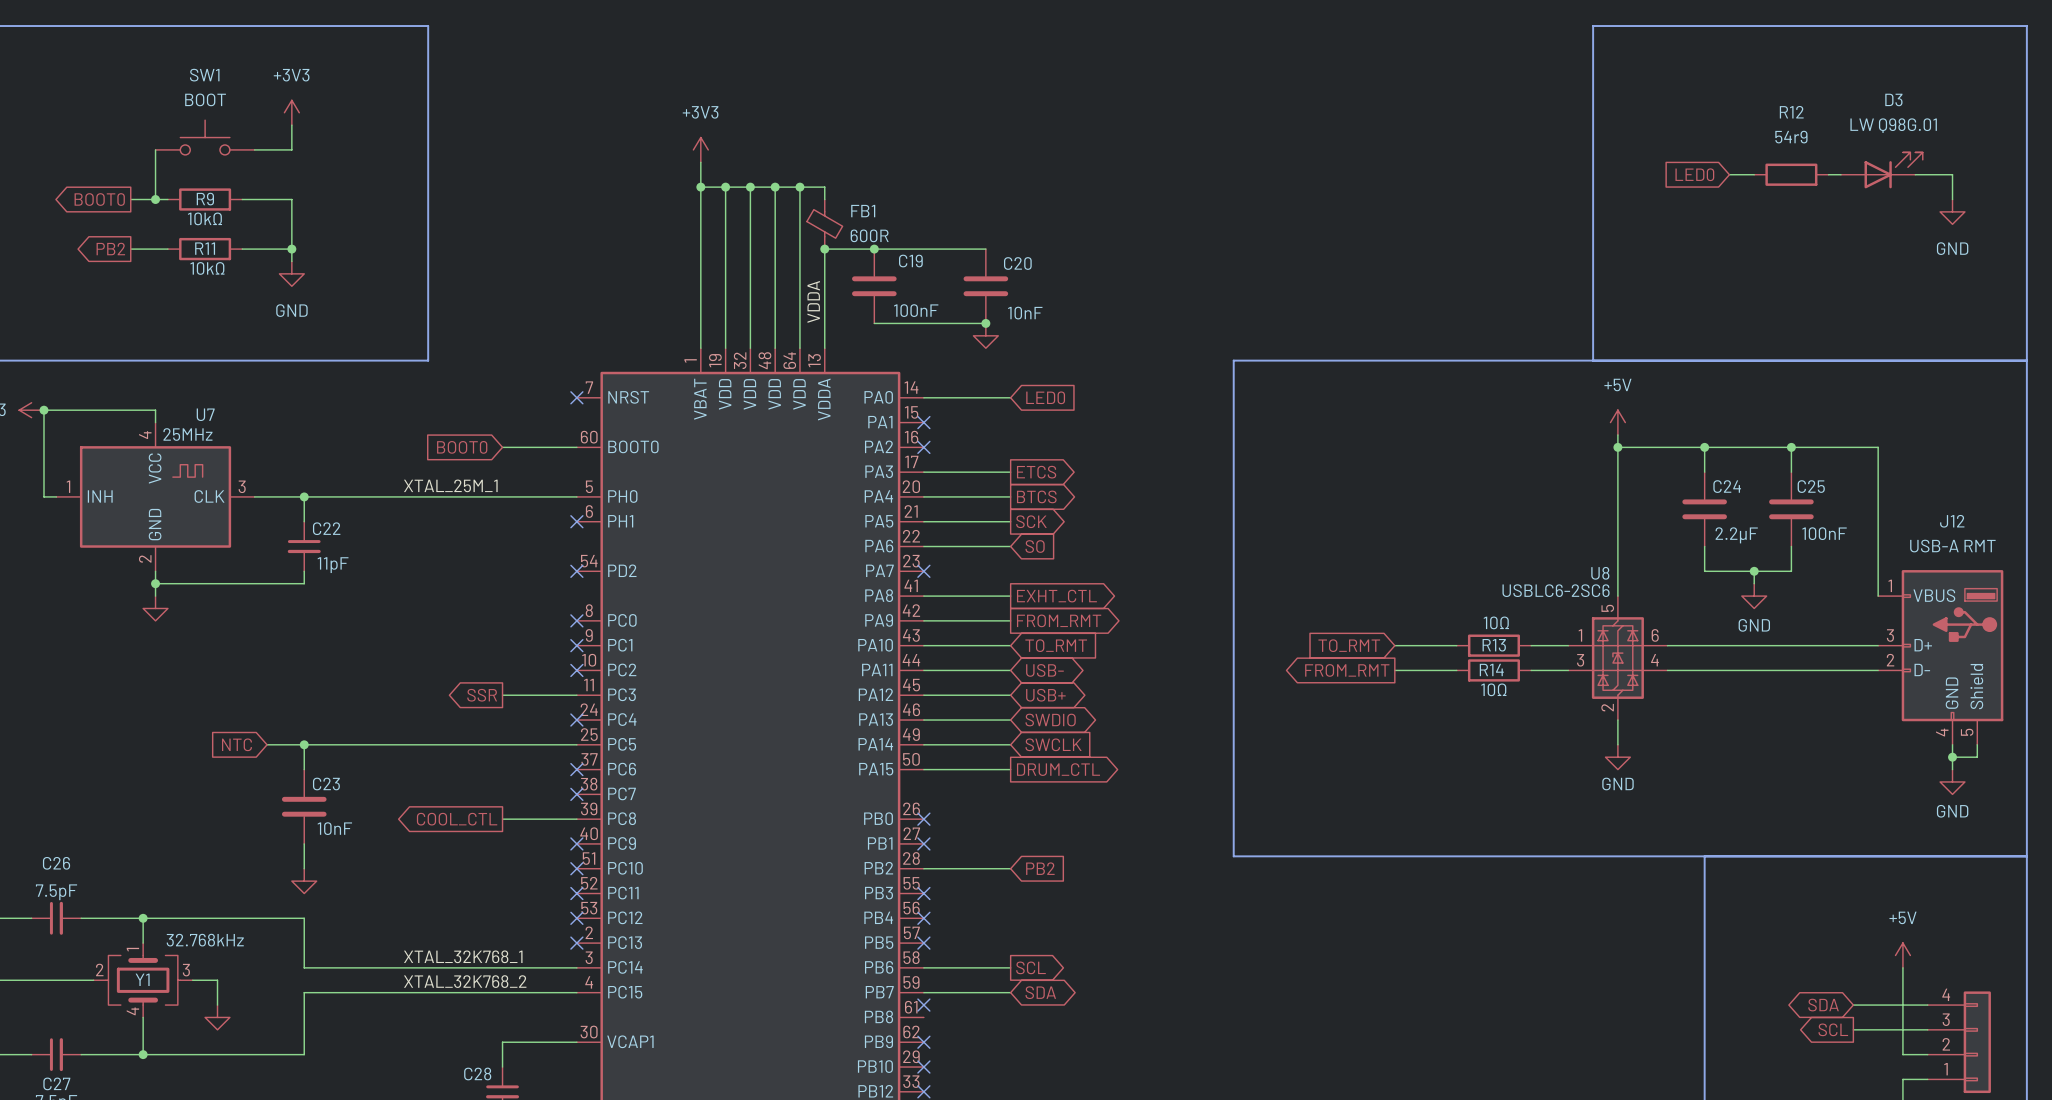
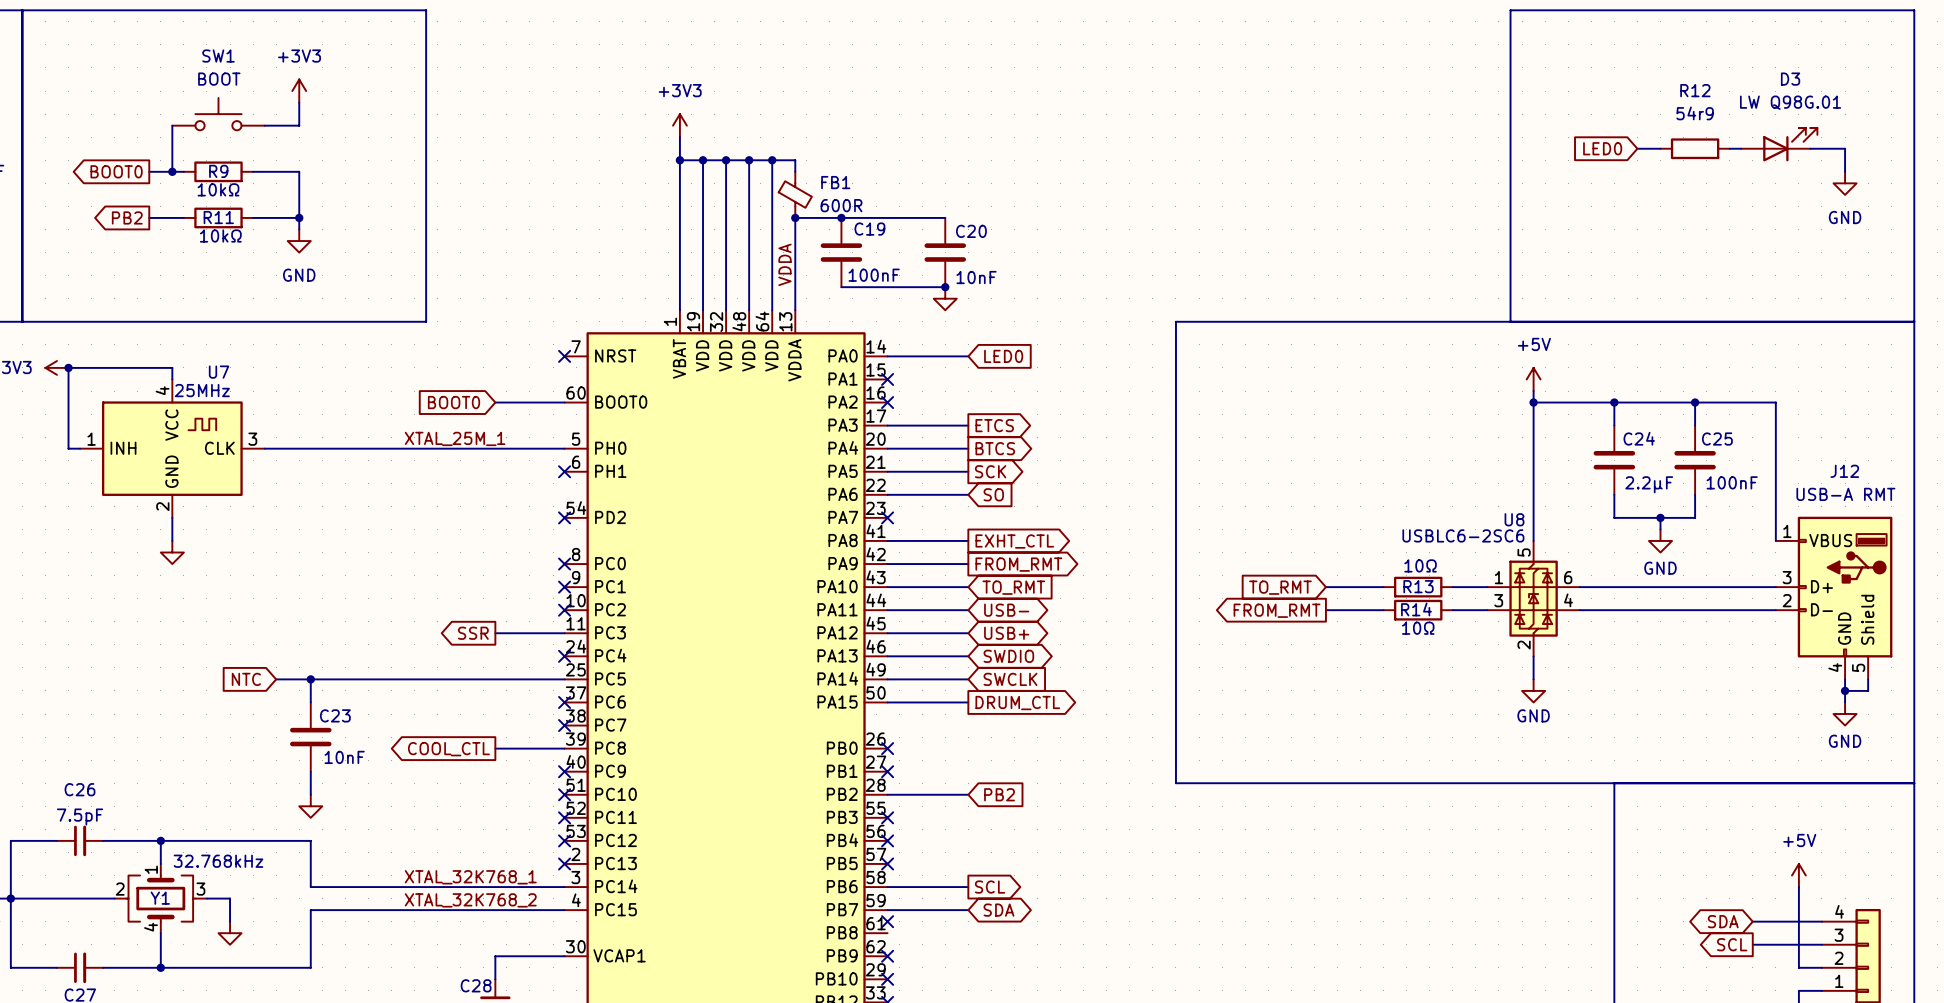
wire: (304, 496) (304, 521) -> none
junction: (304, 496) -> none
C22: 11pF (304, 546) -> none
wire: (304, 571) (304, 583) (155, 583) -> none
junction: (155, 583) -> none

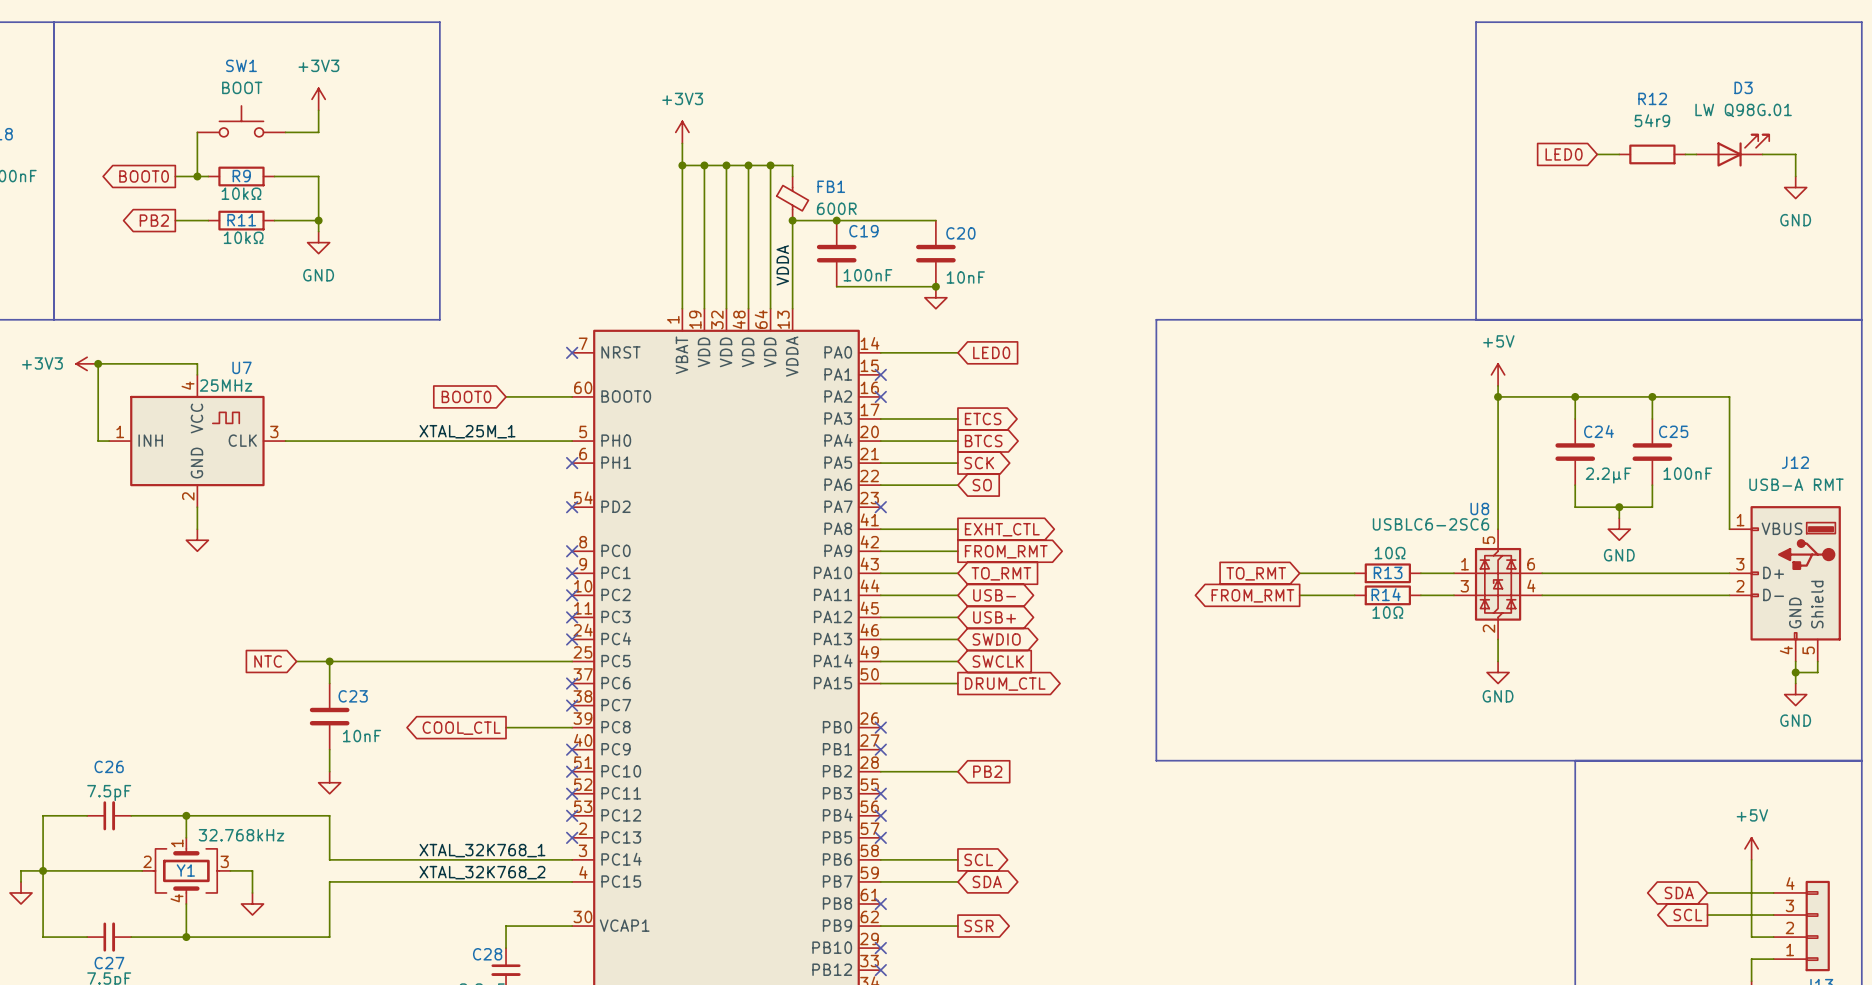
global label: SSR (473, 633) -> none
wire: (495, 633) (564, 633) -> none
no-connect mark: none -> (572, 617)
no-connect mark: (887, 921) -> none
no-connect mark: none -> (880, 903)
wire: none -> (880, 926) (957, 926)
no-connect mark: (887, 956) -> none
global label: none -> SSR (978, 926)

